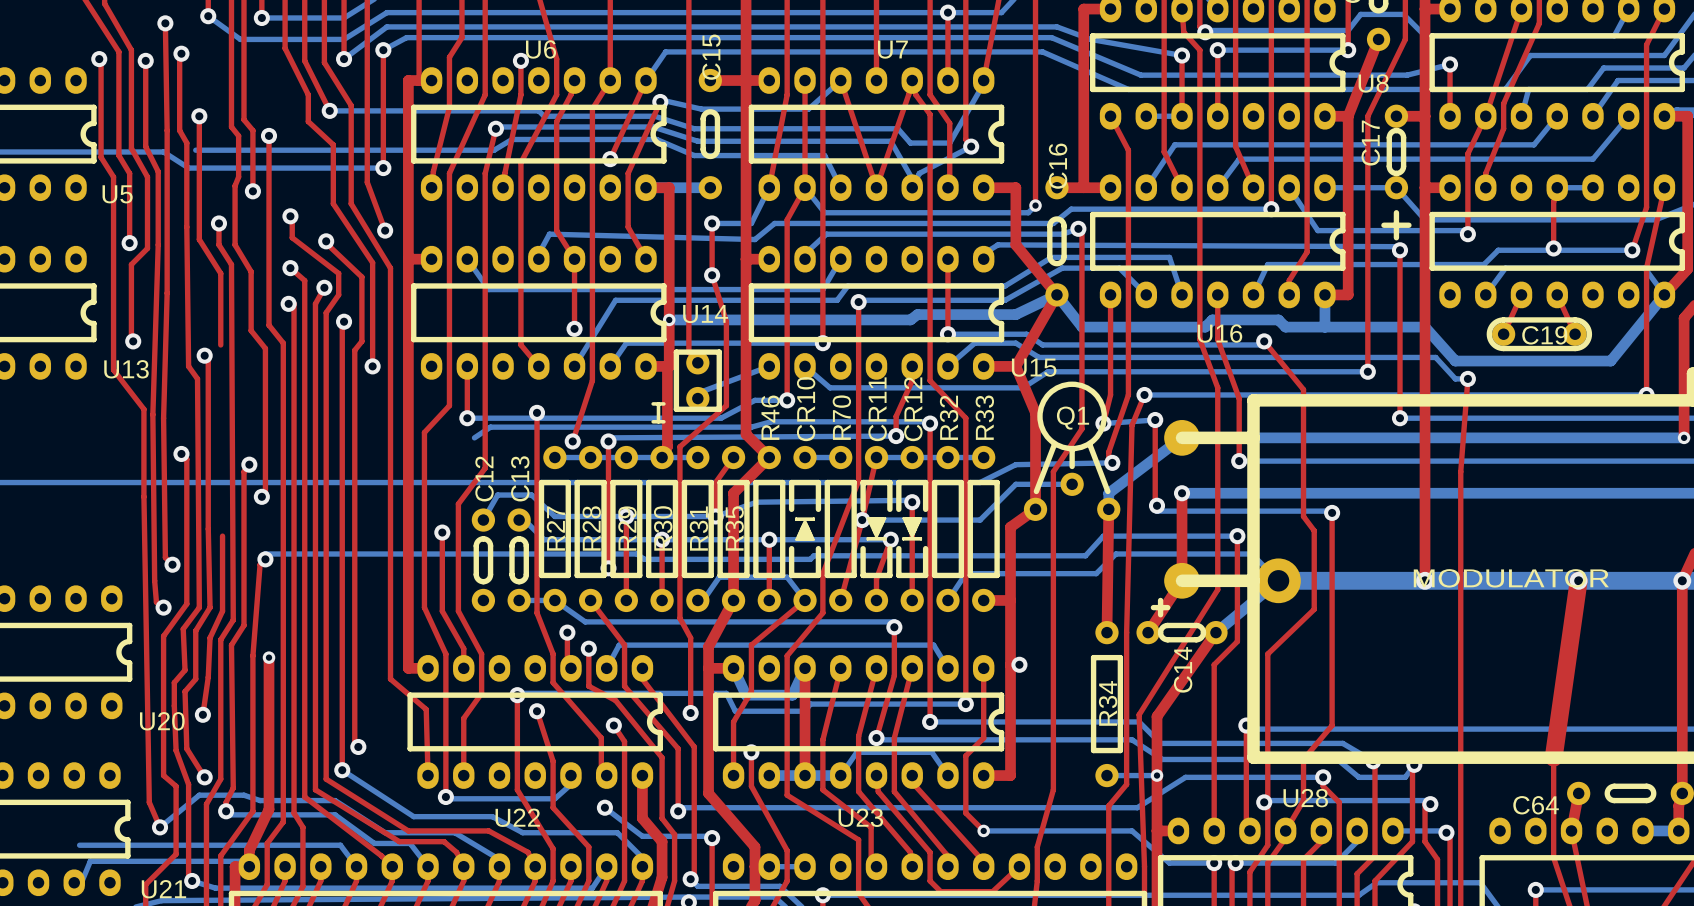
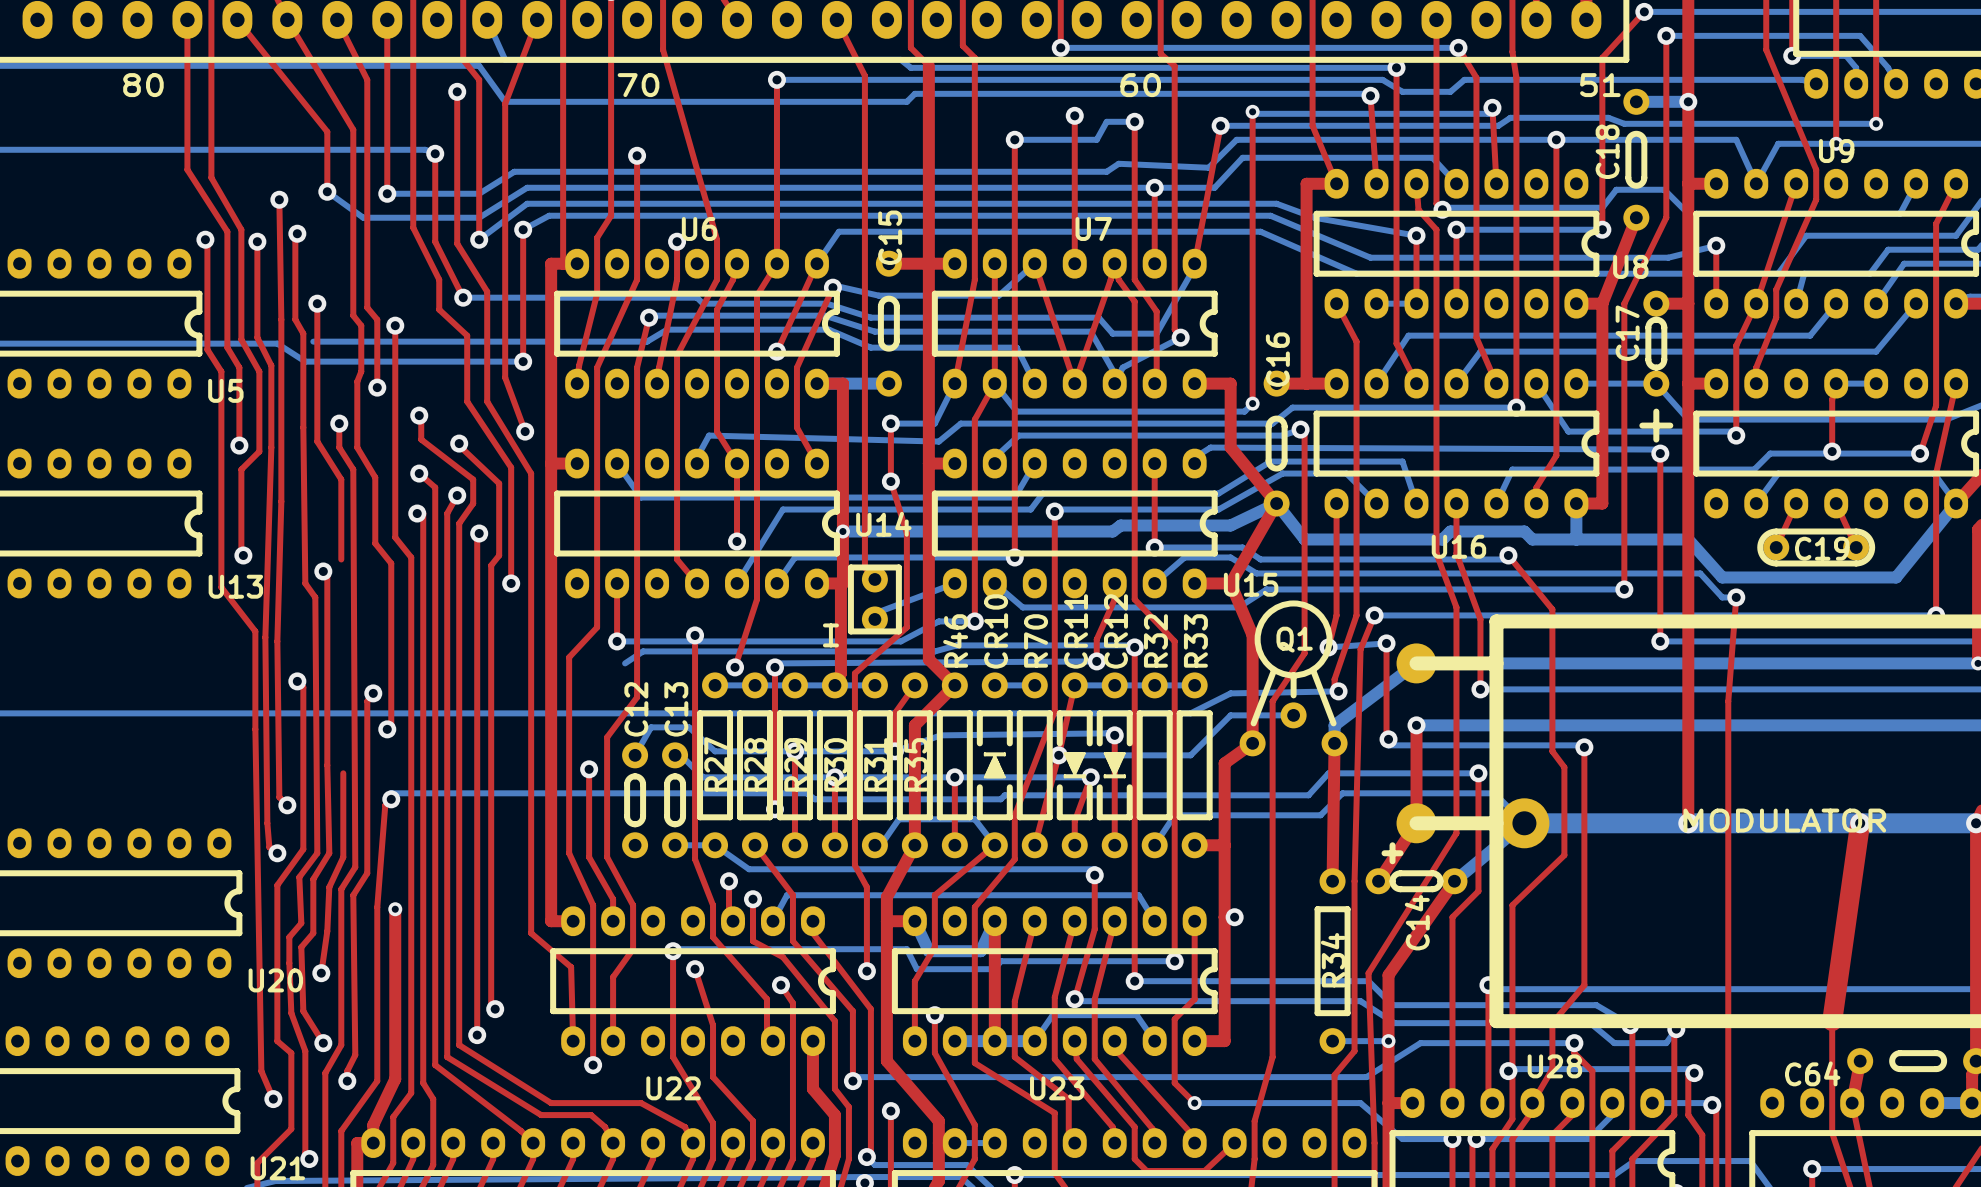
bottom track: (342, 770) (413, 816) (492, 816) (522, 832) (617, 832) (642, 857) (642, 866) -> none
bottom track: (570, 775) (570, 784) (554, 798) (445, 798) (445, 797) -> none
bottom track: (604, 807) (642, 836) (712, 836) (712, 838) -> none
via: (604, 807) -> none
bottom track: (226, 811) (226, 814) (335, 814) (374, 843) (410, 843) (428, 866) -> none
bottom track: (160, 827) (199, 795) (243, 795) (260, 800) (335, 800) (385, 832) (454, 832) (499, 859) (499, 866) -> none
bottom track: (79, 845) (340, 845) (356, 866) -> none
bottom track: (249, 866) (249, 861) (90, 861) (81, 882) (74, 882) -> none
bottom track: (606, 866) (592, 888) (215, 888) (192, 880) -> none

